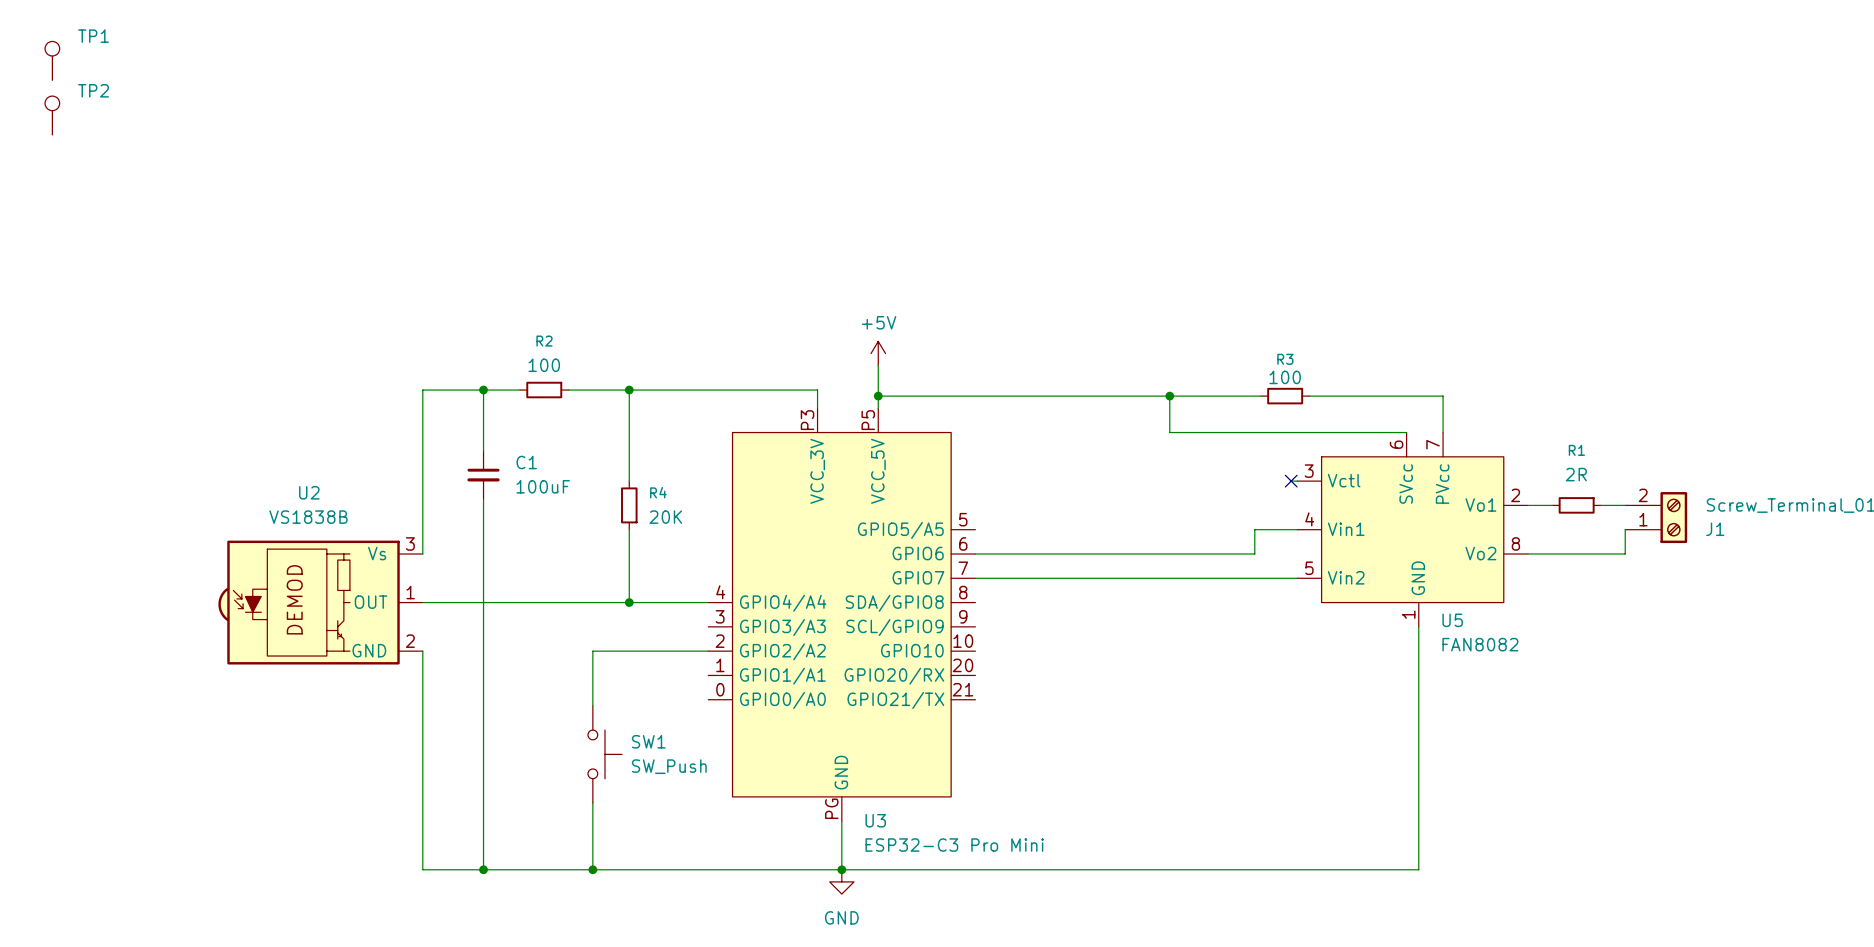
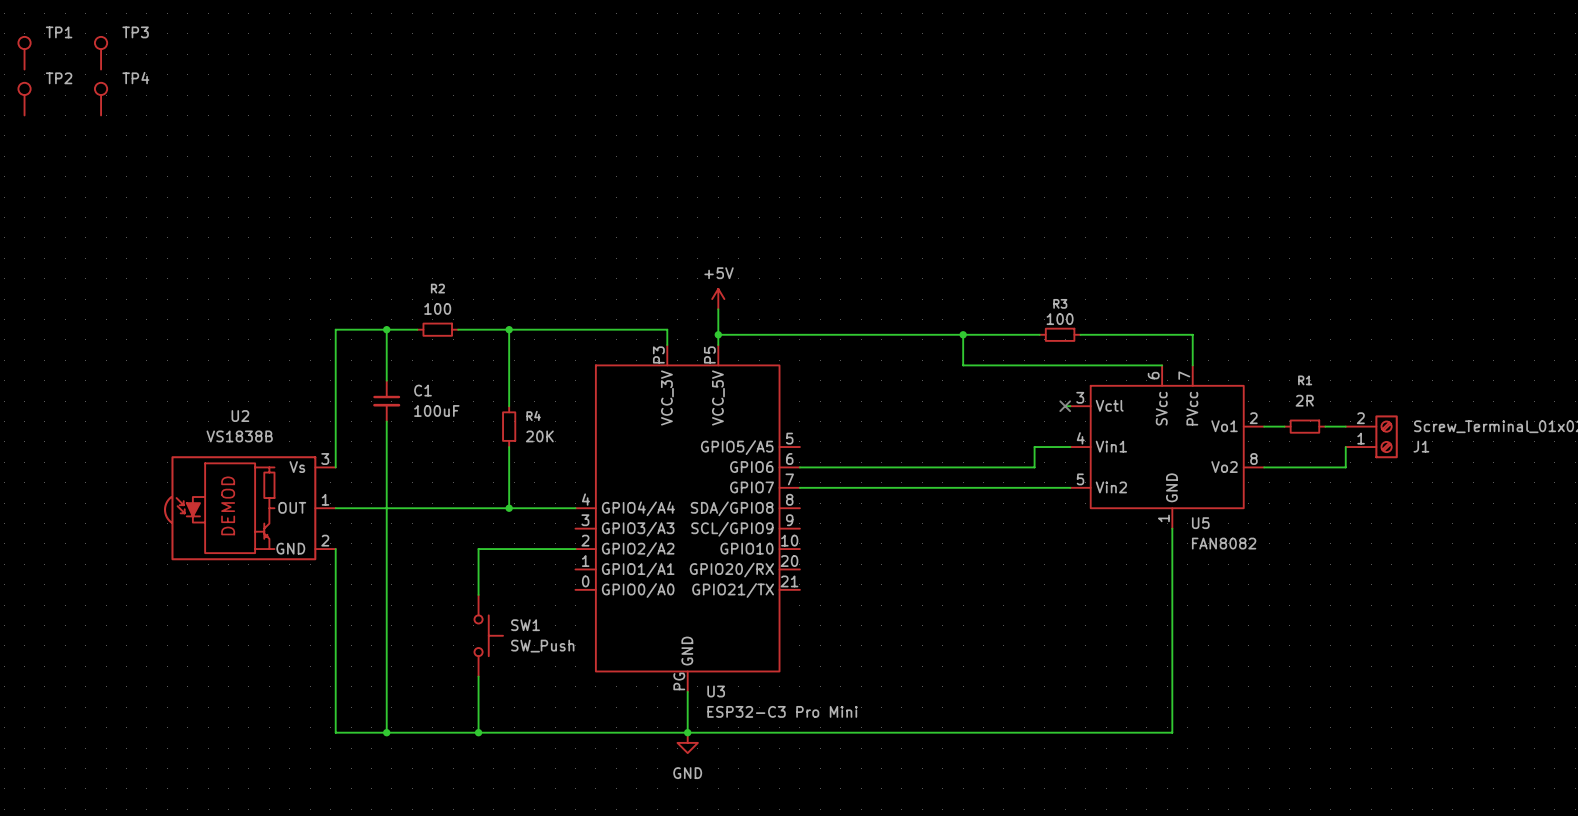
TP3: none -> (101, 53)
TP4: none -> (101, 99)

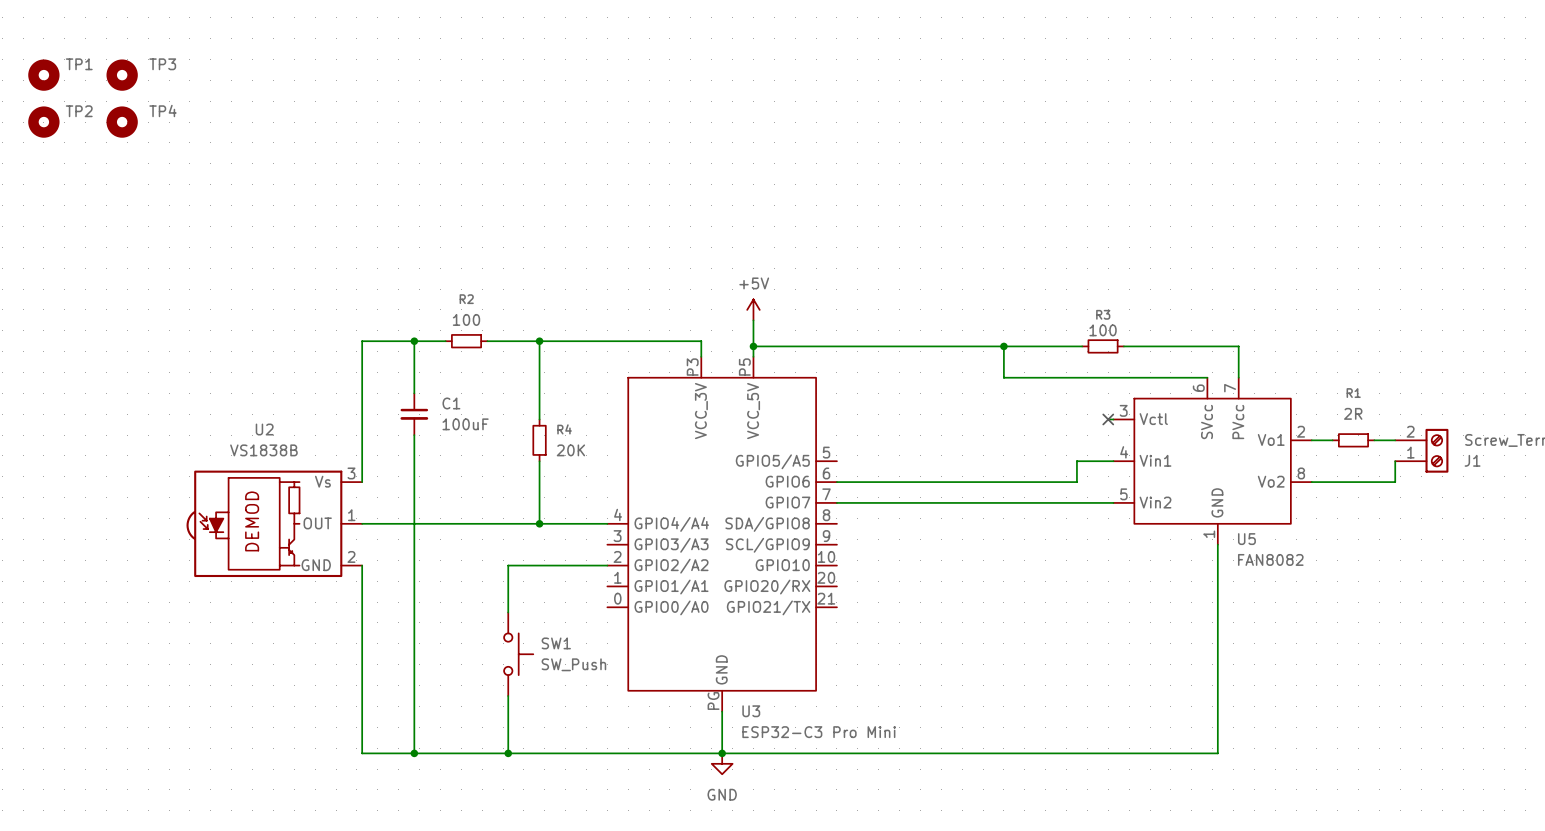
TP1 symbol: [18, 36, 31, 70] -> [28, 59, 60, 91]
TP3 symbol: [94, 36, 108, 70] -> [106, 59, 138, 91]
TP2 symbol: [18, 82, 31, 116] -> [28, 106, 60, 138]
TP4 symbol: [94, 82, 108, 116] -> [106, 106, 138, 138]

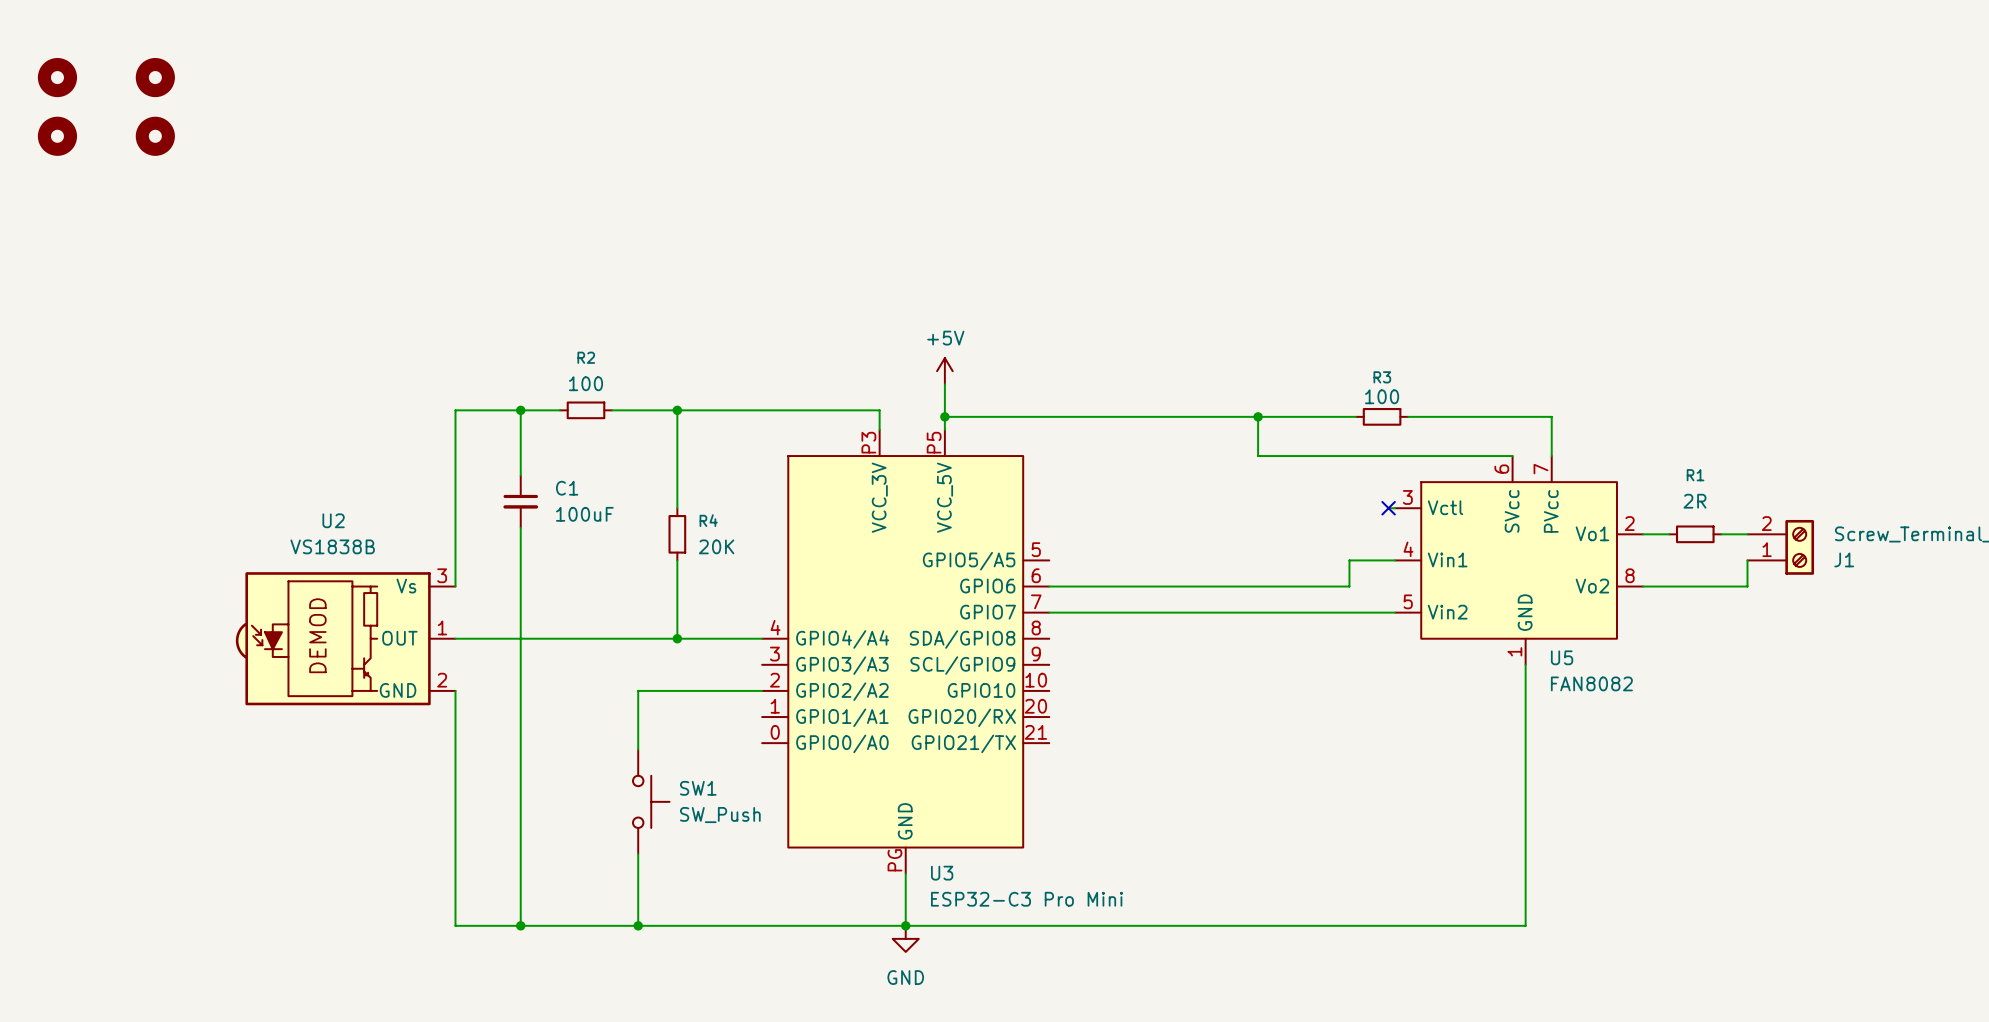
TP1 name: TP1 (79, 64) -> none
TP3 name: TP3 (162, 64) -> none
TP2 name: TP2 (79, 111) -> none
TP4 name: TP4 (162, 111) -> none

